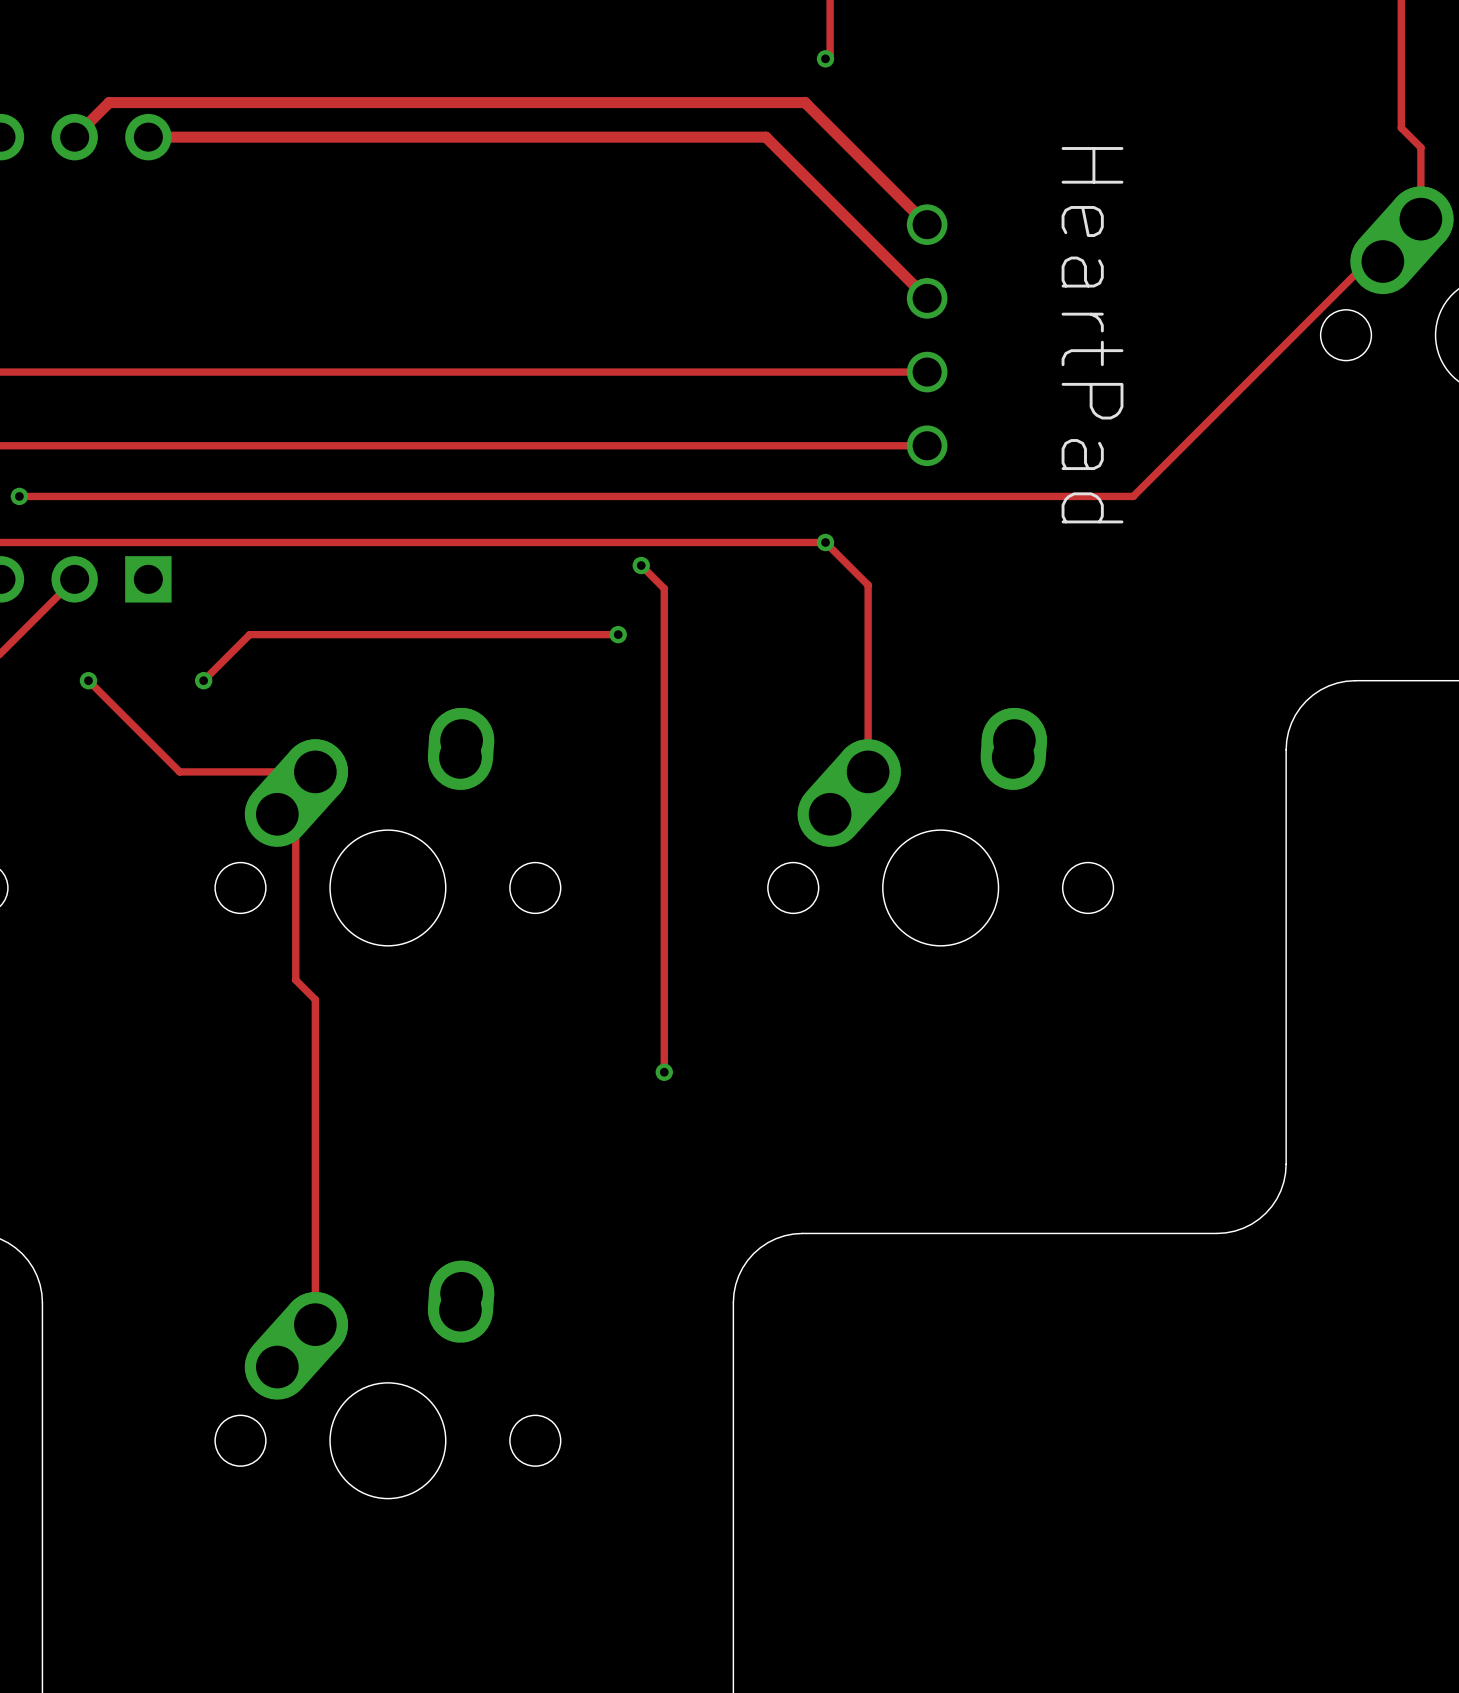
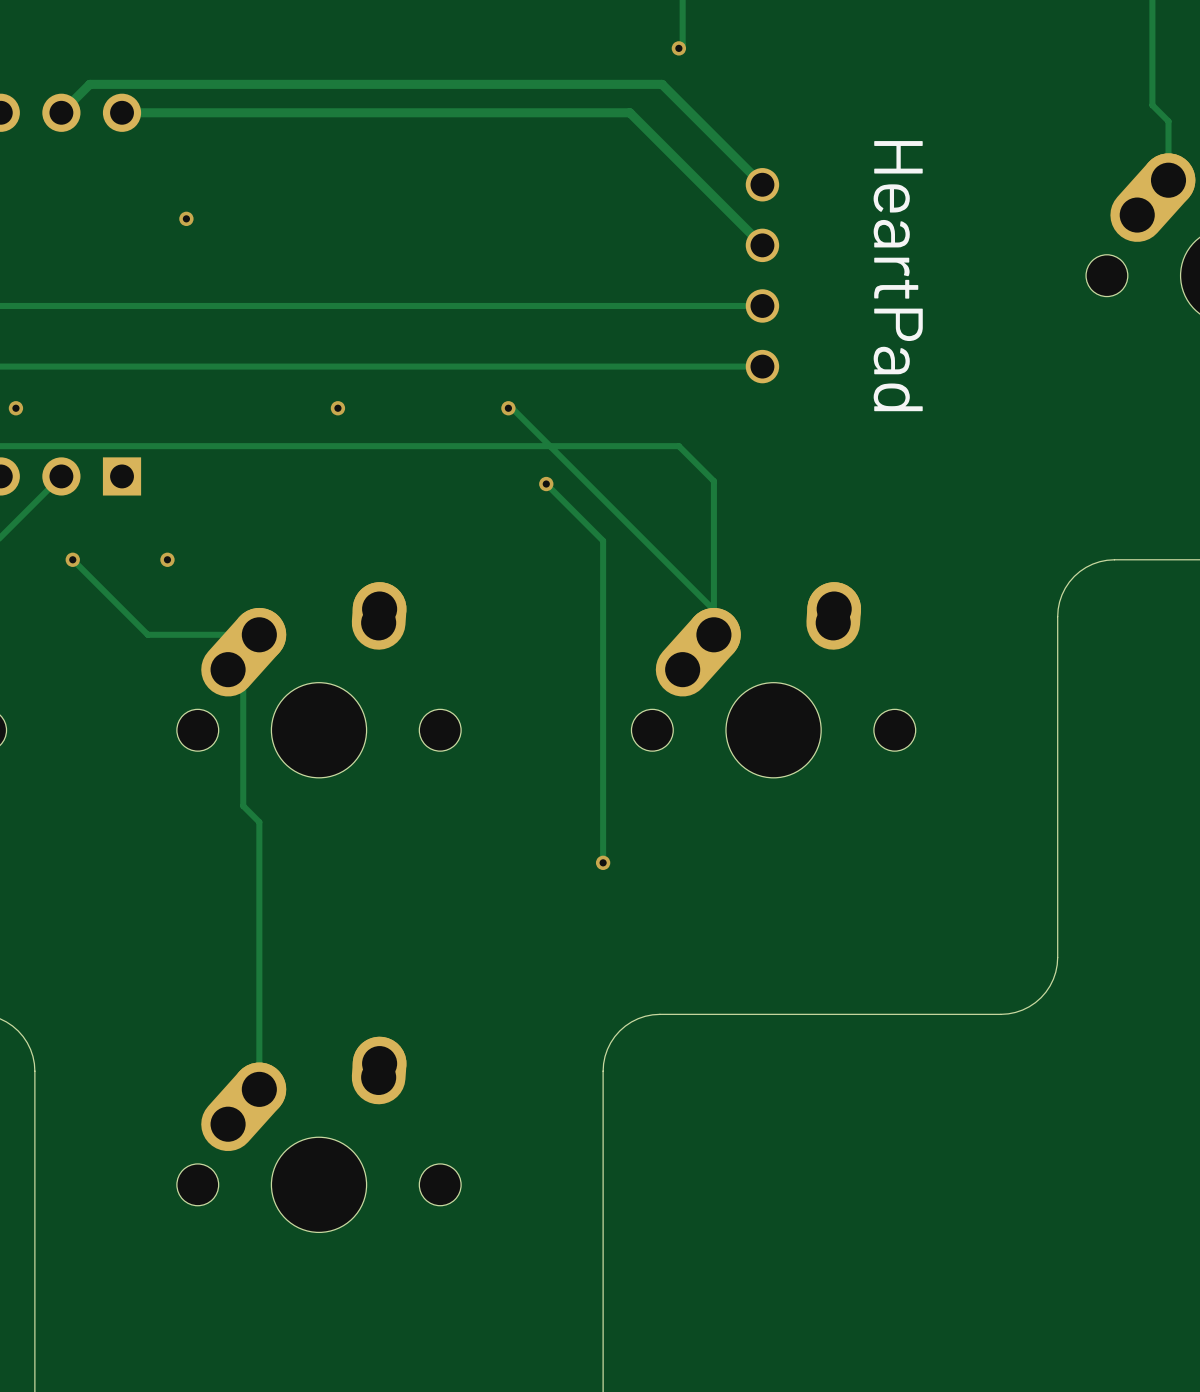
track: (1382, 261) (1368, 261) (1133, 496) (622, 496) -> (712, 609) (512, 408)
via: none -> (186, 218)
track: (19, 496) (618, 496) -> none
via: none -> (337, 408)
via: none -> (508, 408)
via: (825, 542) -> none
track: (641, 565) (664, 588) (664, 1072) -> none
via: (641, 565) -> none
track: none -> (546, 484) (603, 540) (603, 862)
via: none -> (546, 484)
track: (618, 634) (249, 634) (203, 680) -> none
via: (618, 634) -> none
via position: (664, 1072) -> (603, 862)

